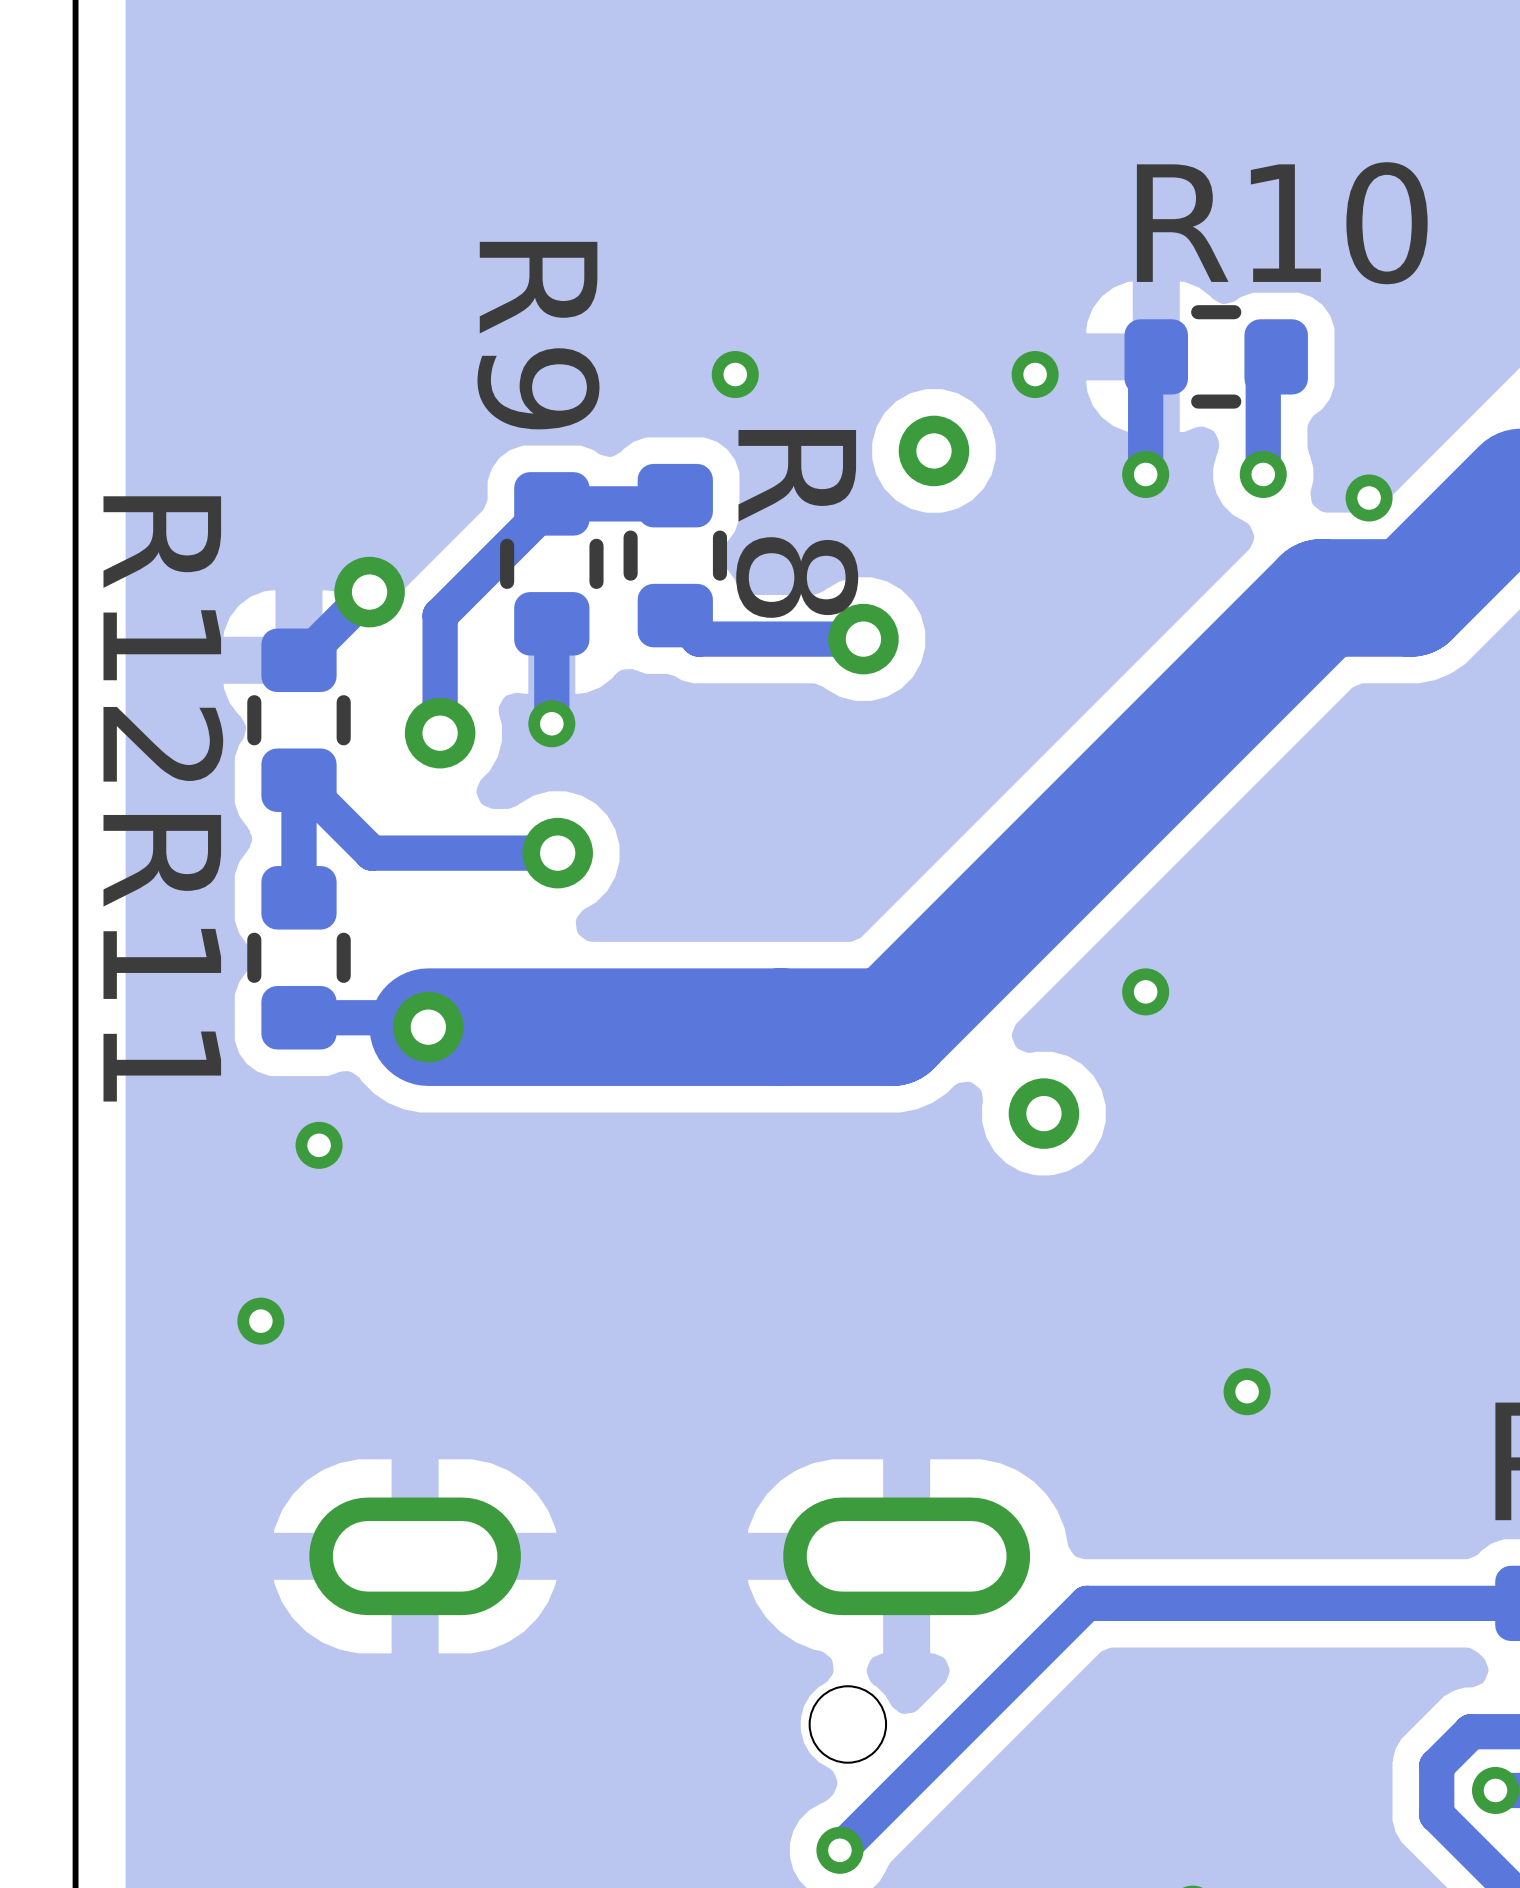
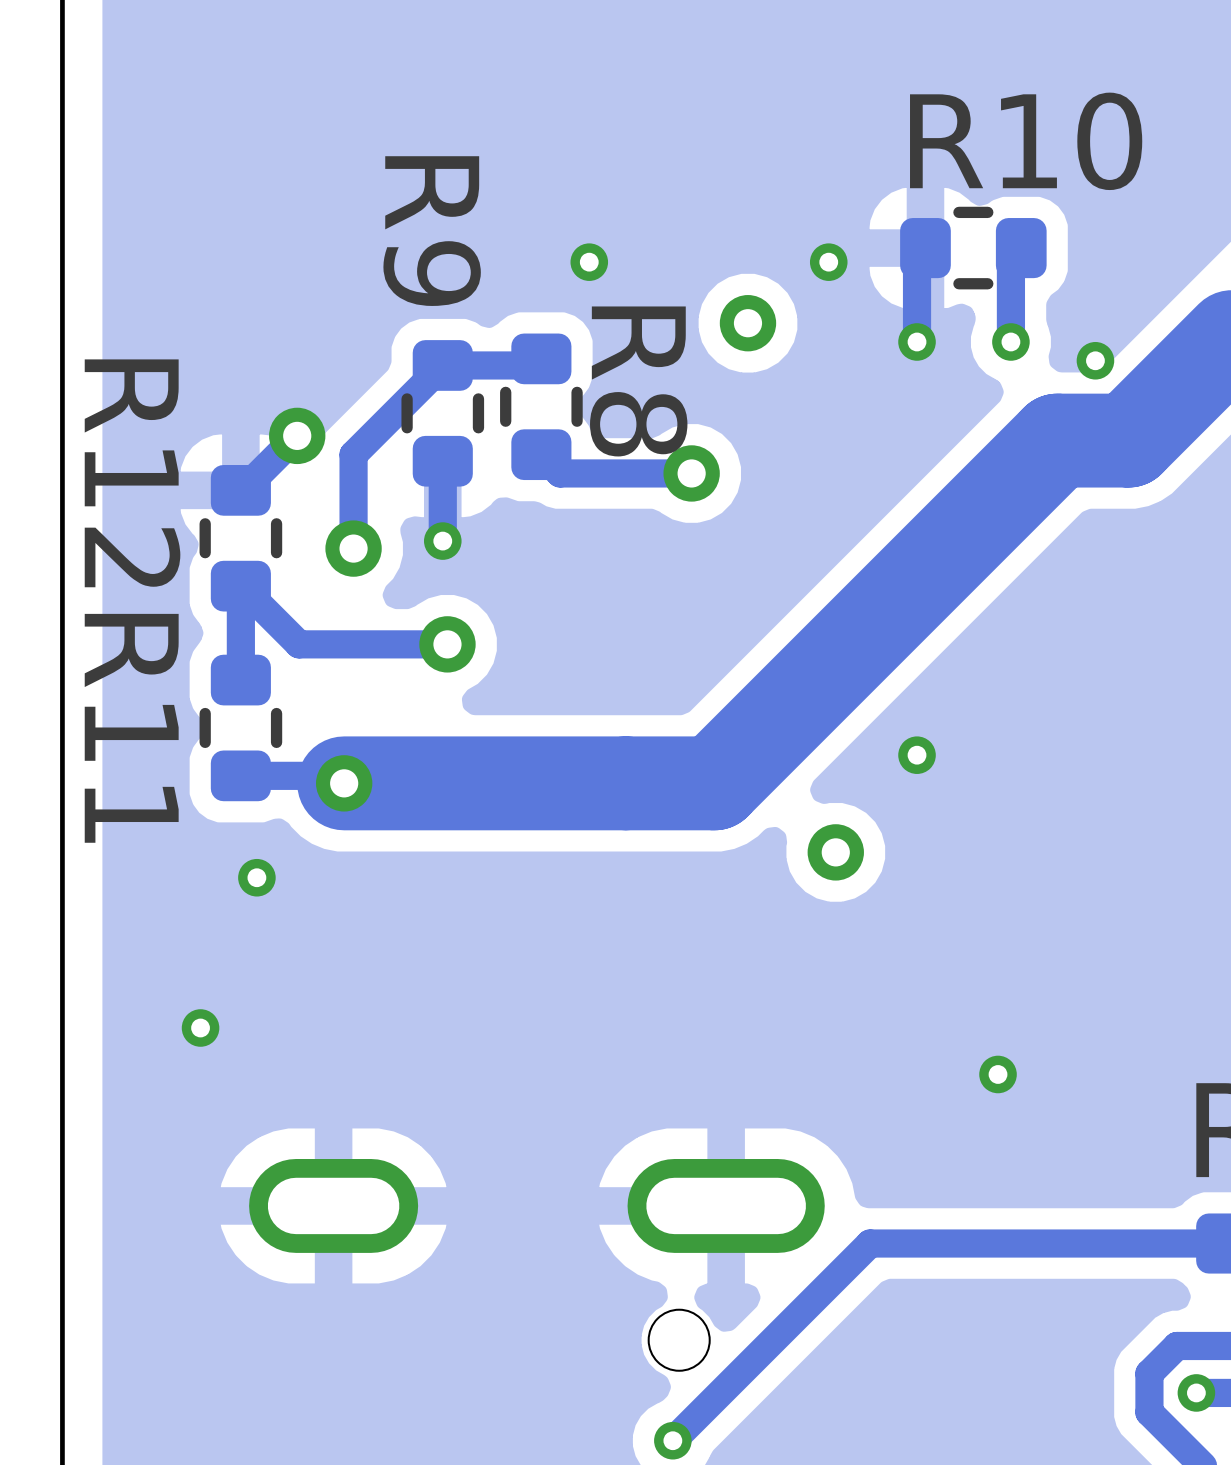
via position: (260, 1321) -> (200, 1027)

